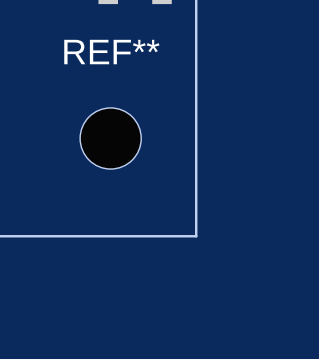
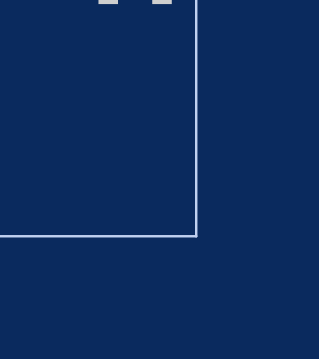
REF**: (110, 138) -> none

